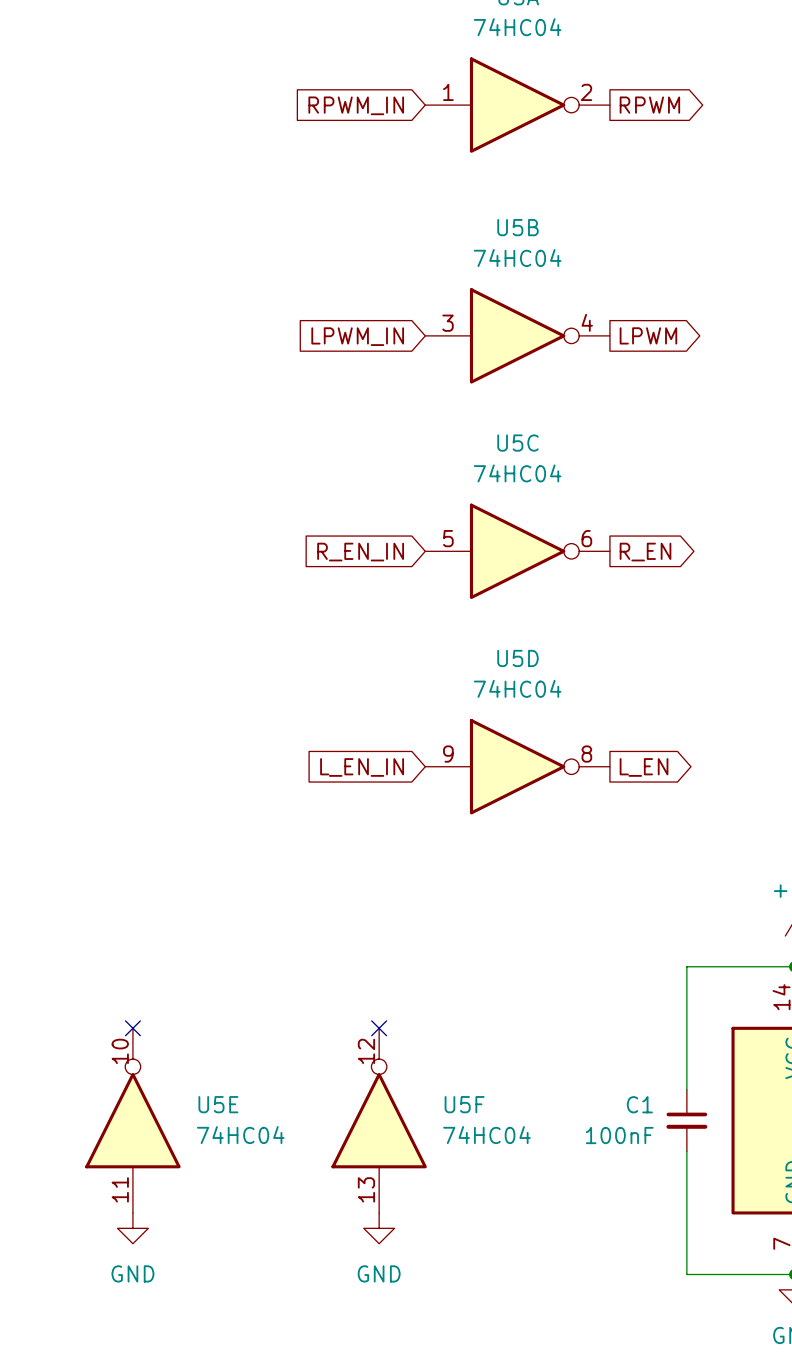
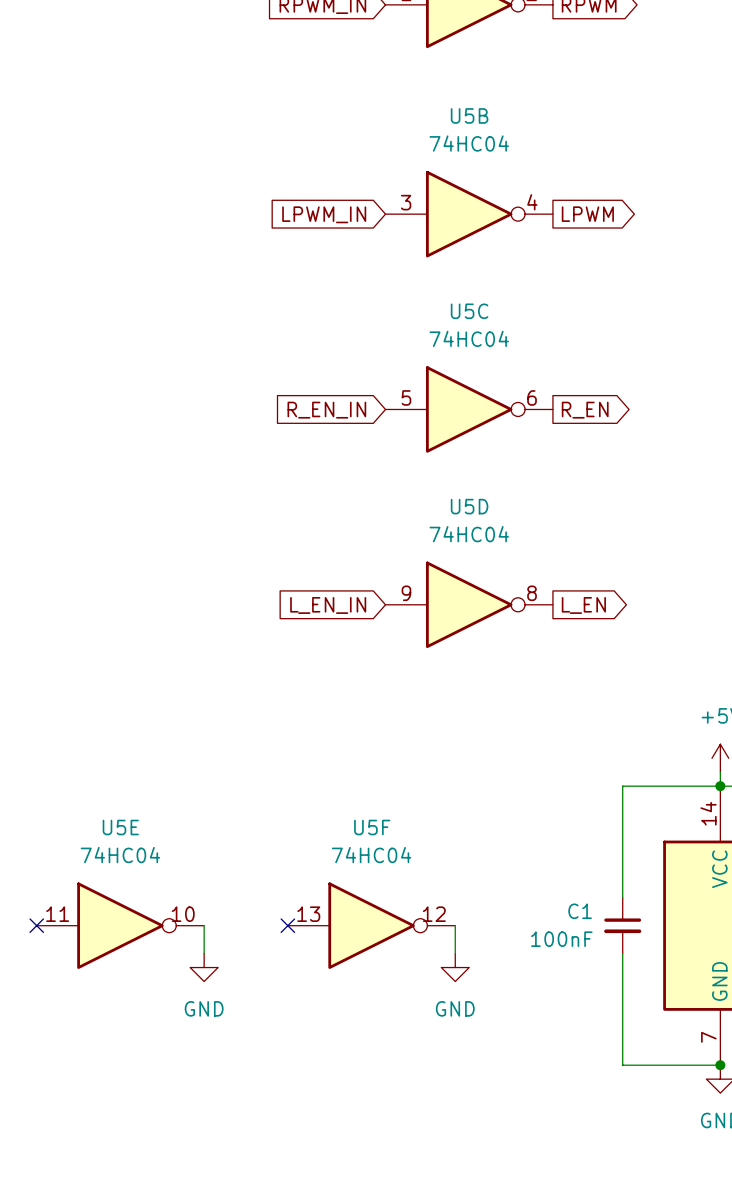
no-connect mark: (132, 1028) -> none
no-connect mark: (379, 1028) -> none
U5E name position: U5E (218, 1104) -> U5E (120, 827)
U5F name position: U5F (464, 1104) -> U5F (372, 827)
no-connect mark: none -> (36, 925)
U5E rotation: 0° (132, 1120) -> 90° clockwise (120, 925)
wire: none -> (204, 925) (204, 953)
no-connect mark: none -> (287, 925)
U5F rotation: 0° (379, 1120) -> 90° clockwise (371, 925)
wire: none -> (455, 925) (455, 953)
U5E value position: 74HC04 (240, 1135) -> 74HC04 (120, 855)
U5F value position: 74HC04 (486, 1135) -> 74HC04 (371, 855)
power symbol: none -> GND (204, 967)
power symbol: none -> GND (455, 967)
power symbol: GND (132, 1228) -> none
power symbol: GND (379, 1228) -> none

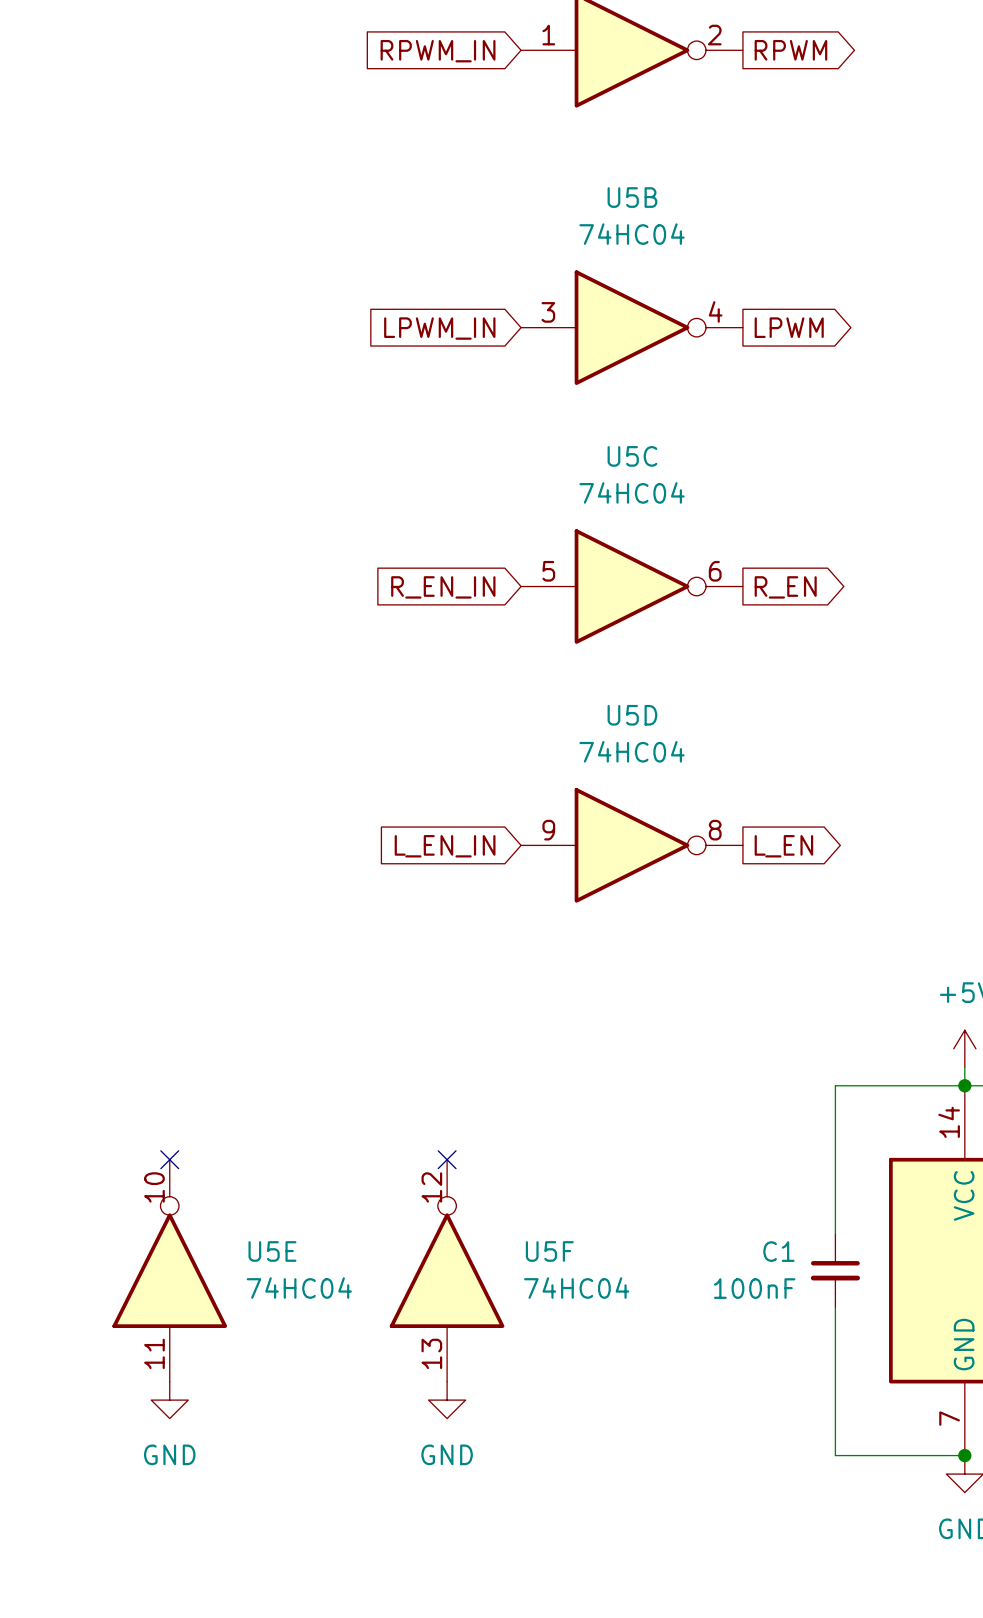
U5E name position: U5E (120, 827) -> U5E (272, 1251)
U5F name position: U5F (372, 827) -> U5F (549, 1251)
no-connect mark: none -> (169, 1159)
no-connect mark: none -> (447, 1159)
U5E value position: 74HC04 (120, 855) -> 74HC04 (299, 1288)
U5F value position: 74HC04 (371, 855) -> 74HC04 (576, 1288)
no-connect mark: (36, 925) -> none
U5E rotation: 0° (120, 925) -> 90° counterclockwise (169, 1270)
wire: (204, 925) (204, 953) -> none
no-connect mark: (287, 925) -> none
U5F rotation: 0° (371, 925) -> 90° counterclockwise (447, 1270)
wire: (455, 925) (455, 953) -> none
power symbol: GND (204, 967) -> none
power symbol: GND (455, 967) -> none
power symbol: none -> GND (169, 1400)
power symbol: none -> GND (447, 1400)

